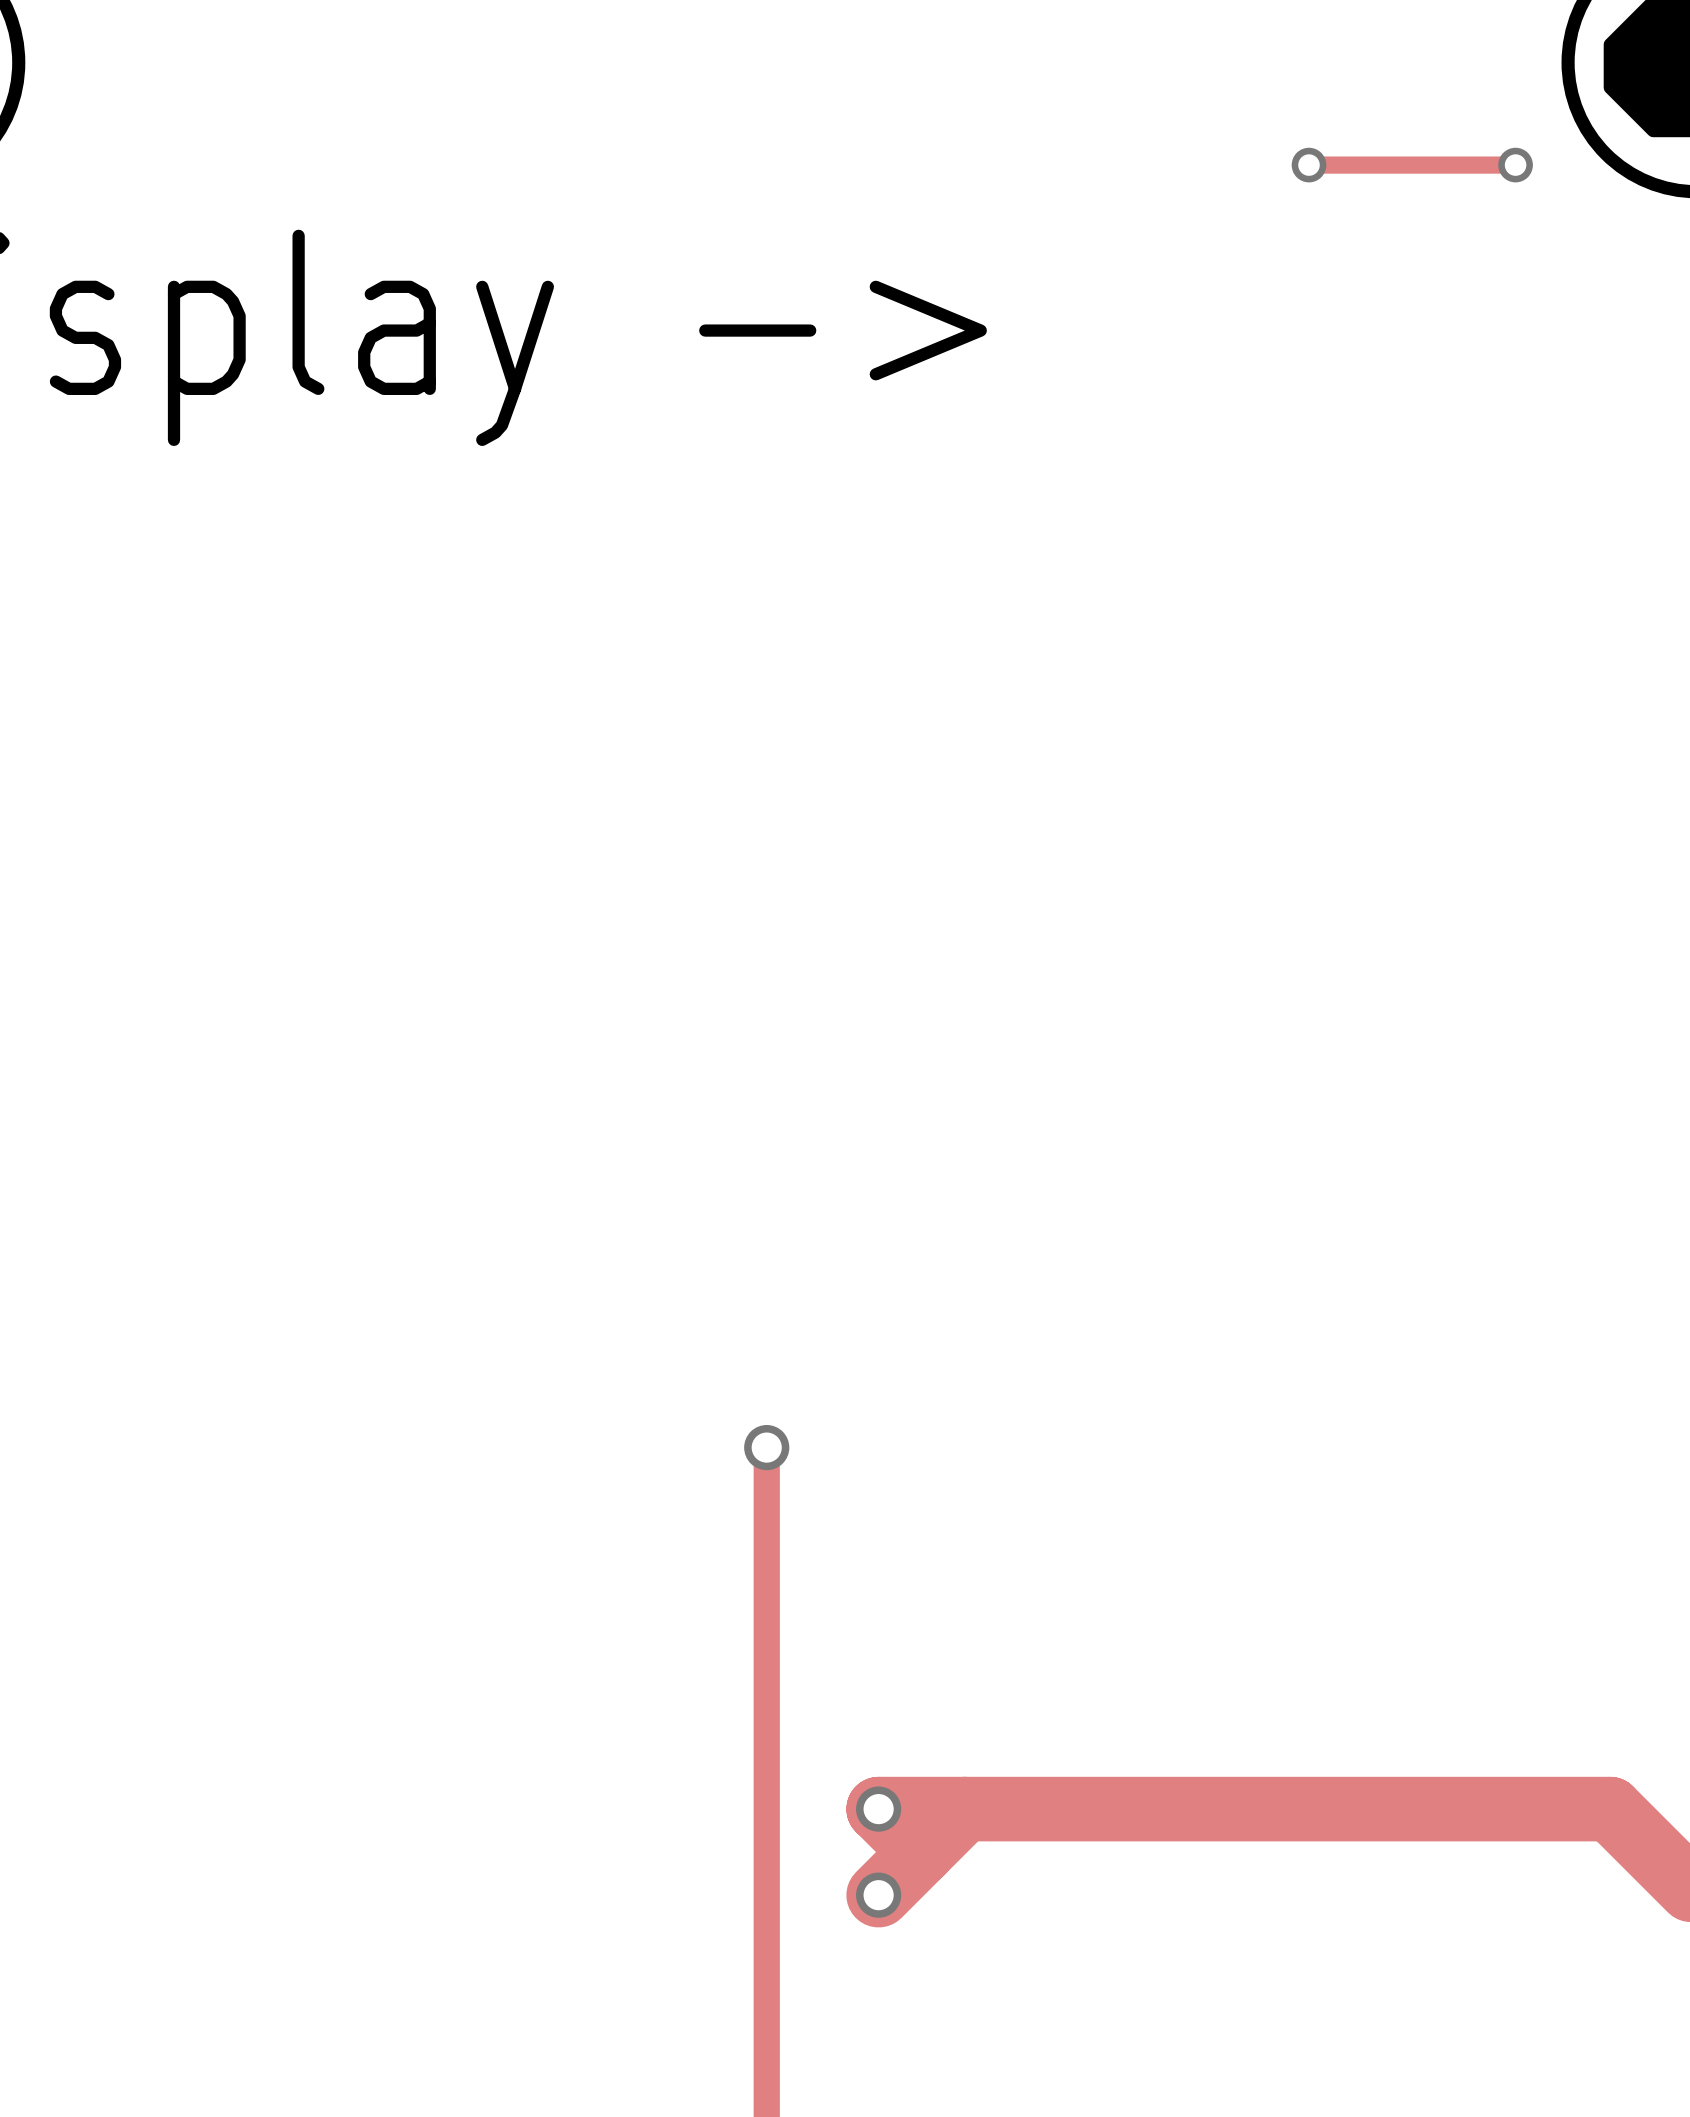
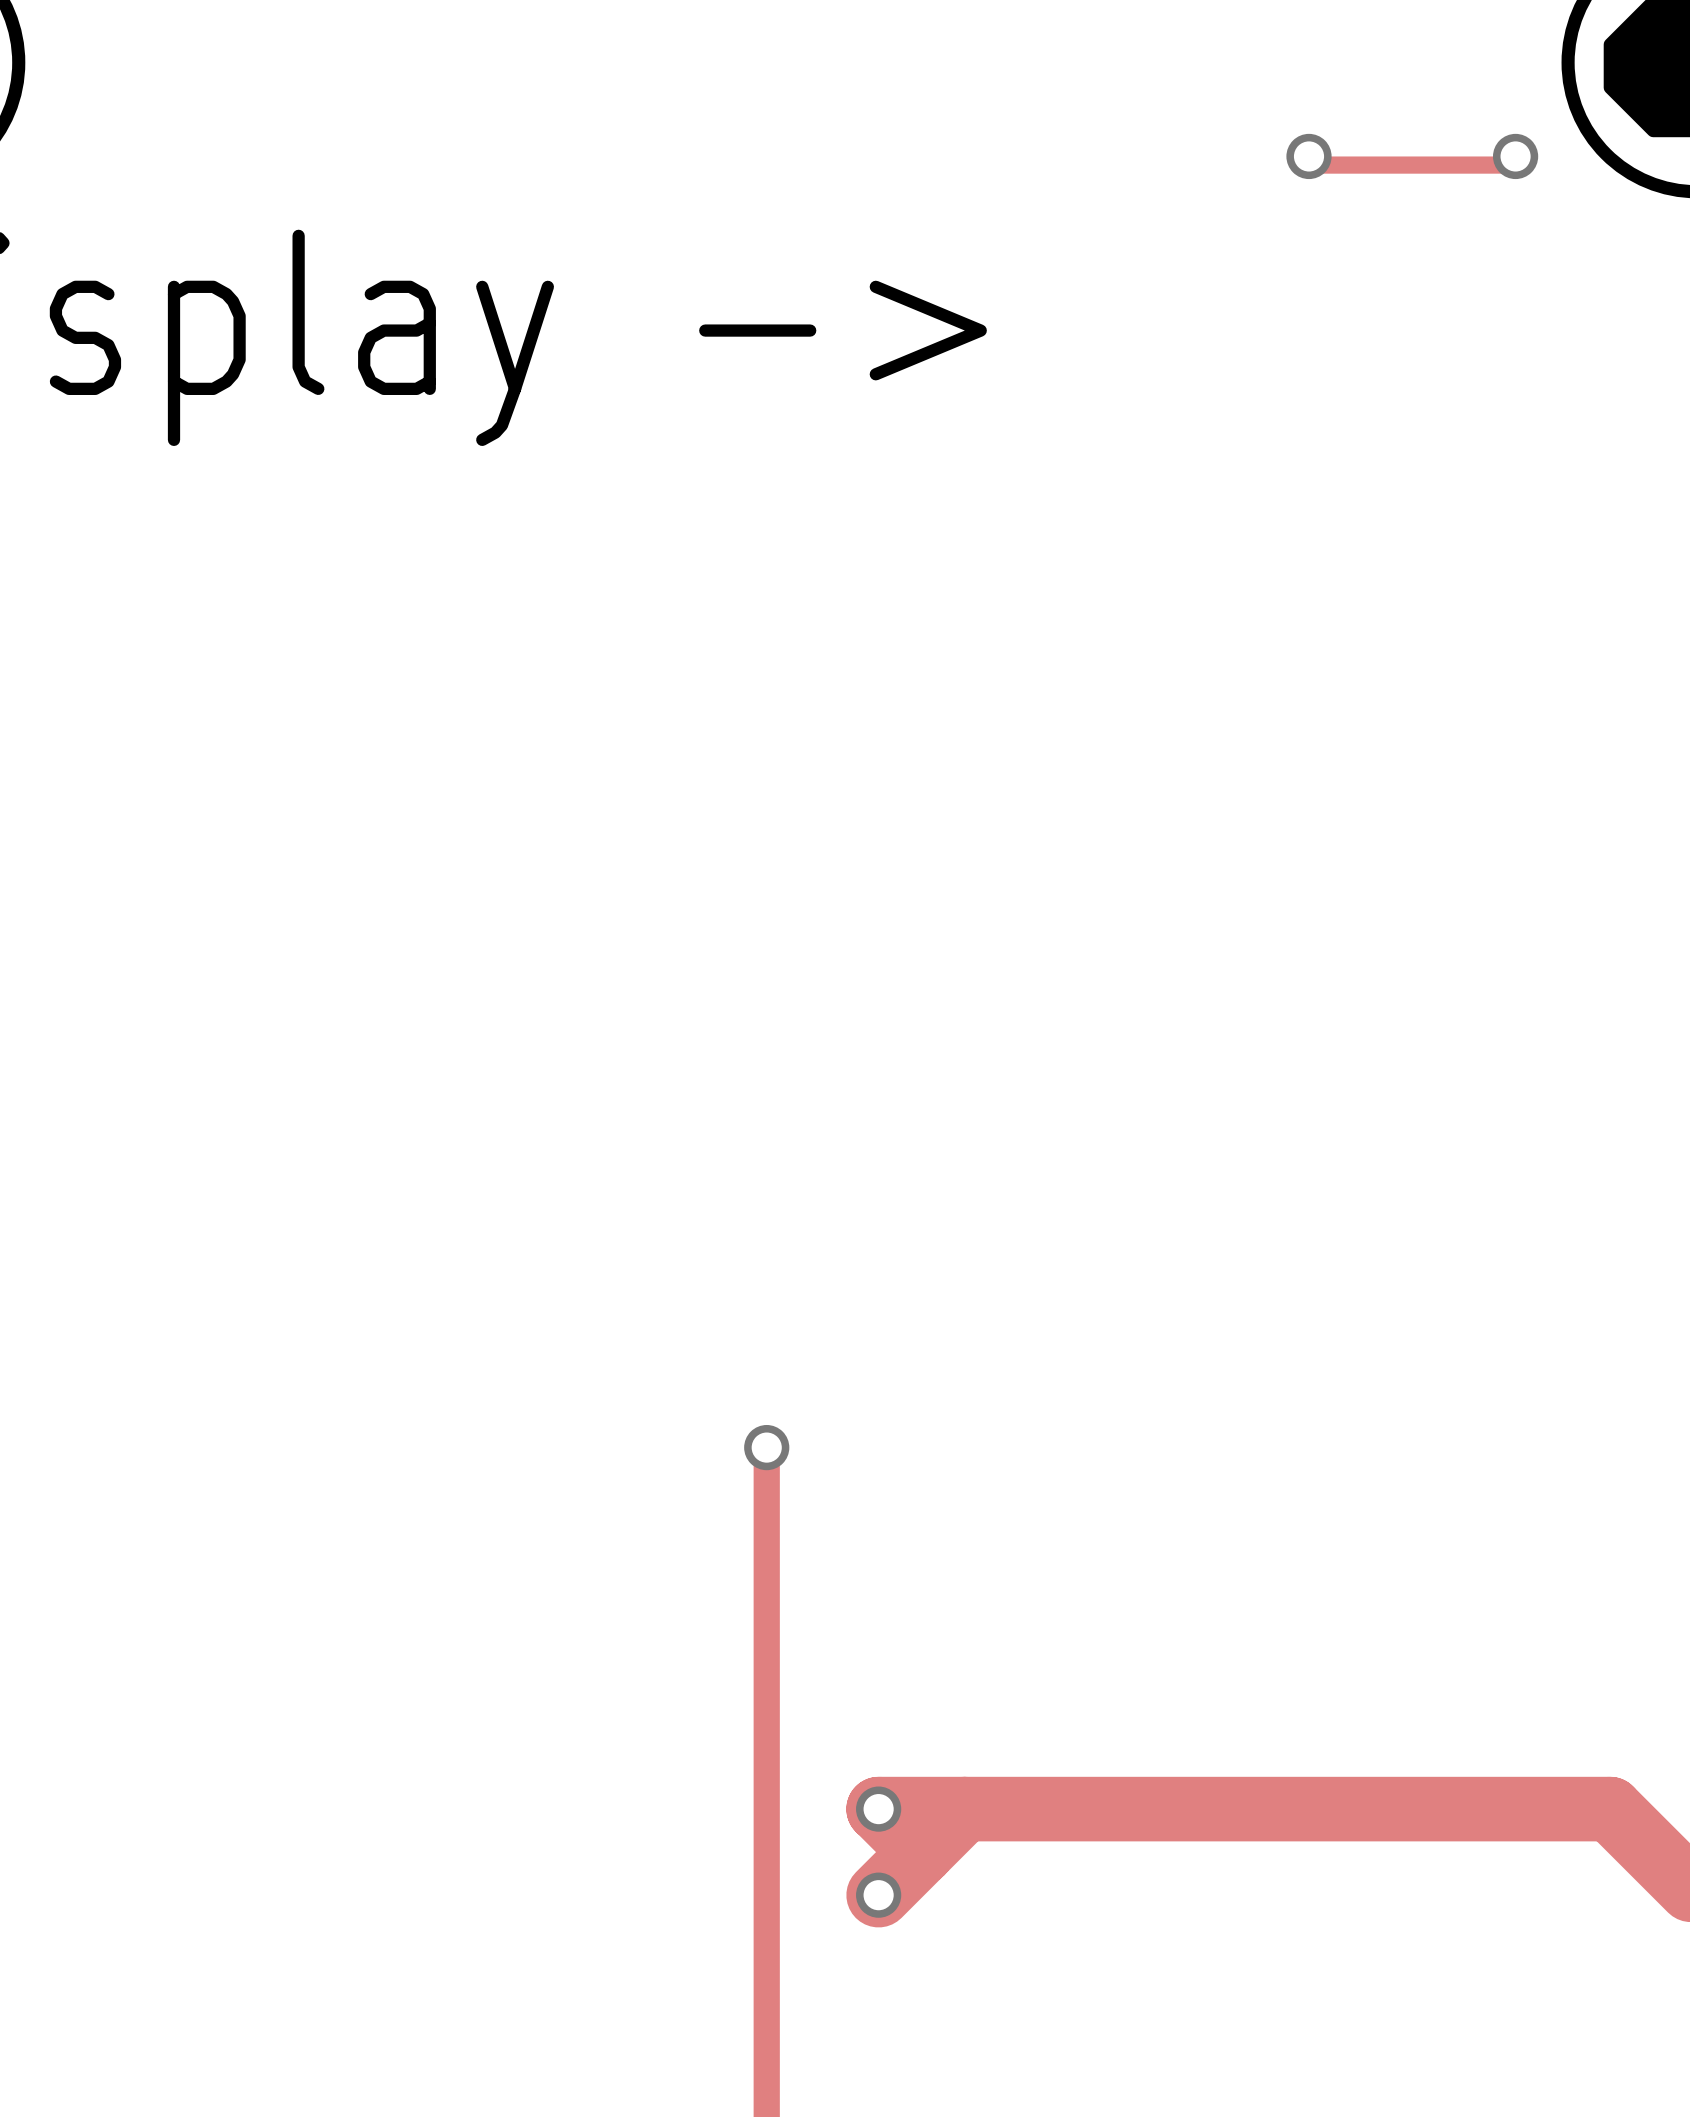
via size: [1291, 147, 1327, 183] -> [1286, 133, 1332, 180]
via size: [1498, 147, 1533, 183] -> [1492, 133, 1539, 180]

